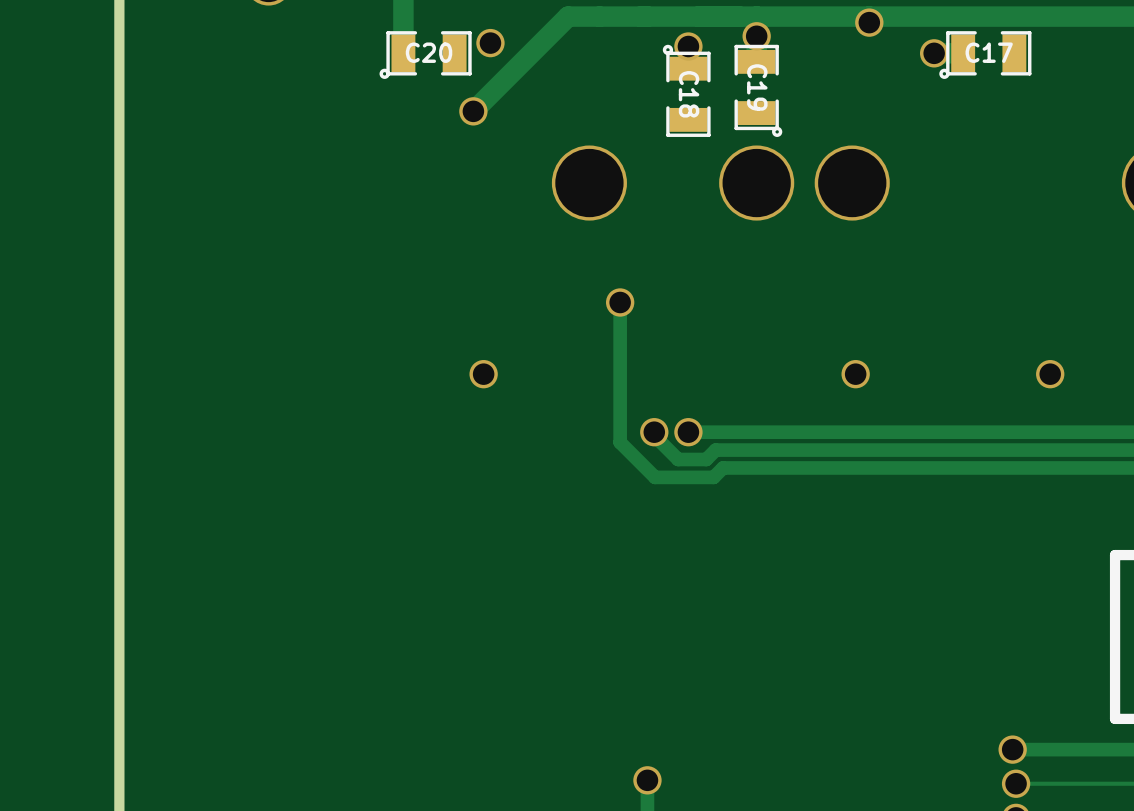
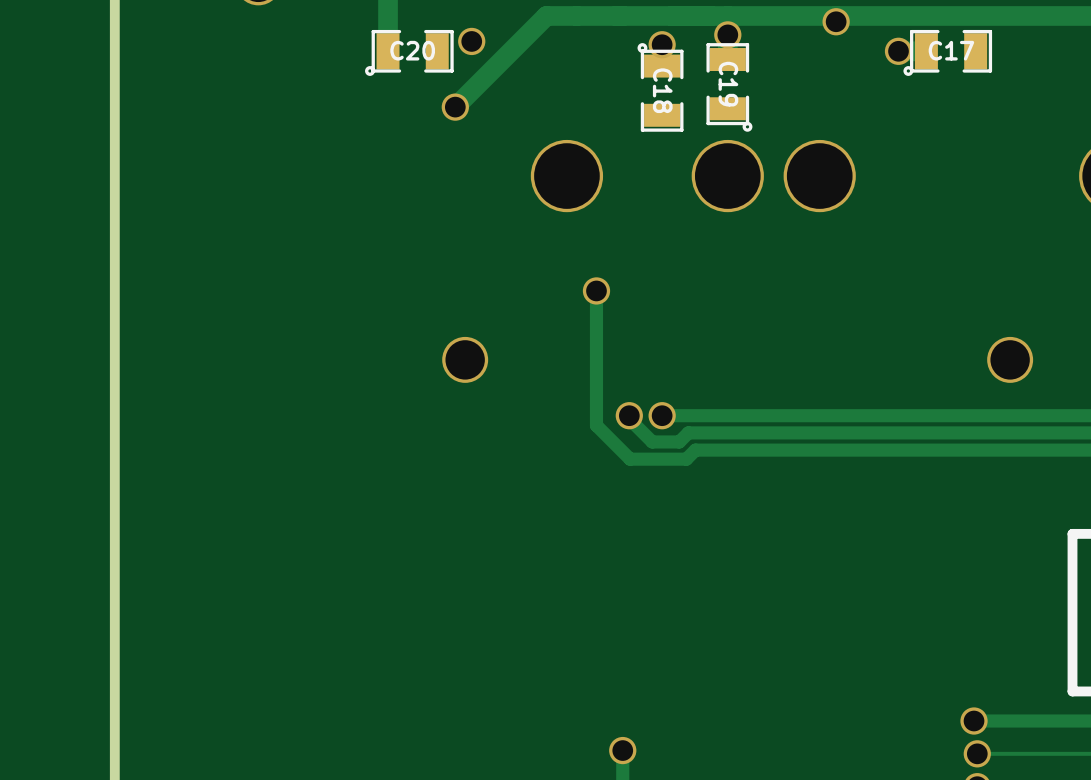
via size: [469, 360, 498, 389] -> [442, 336, 489, 383]
via size: [1036, 360, 1065, 389] -> [987, 336, 1034, 383]
via: (855, 374) -> none

